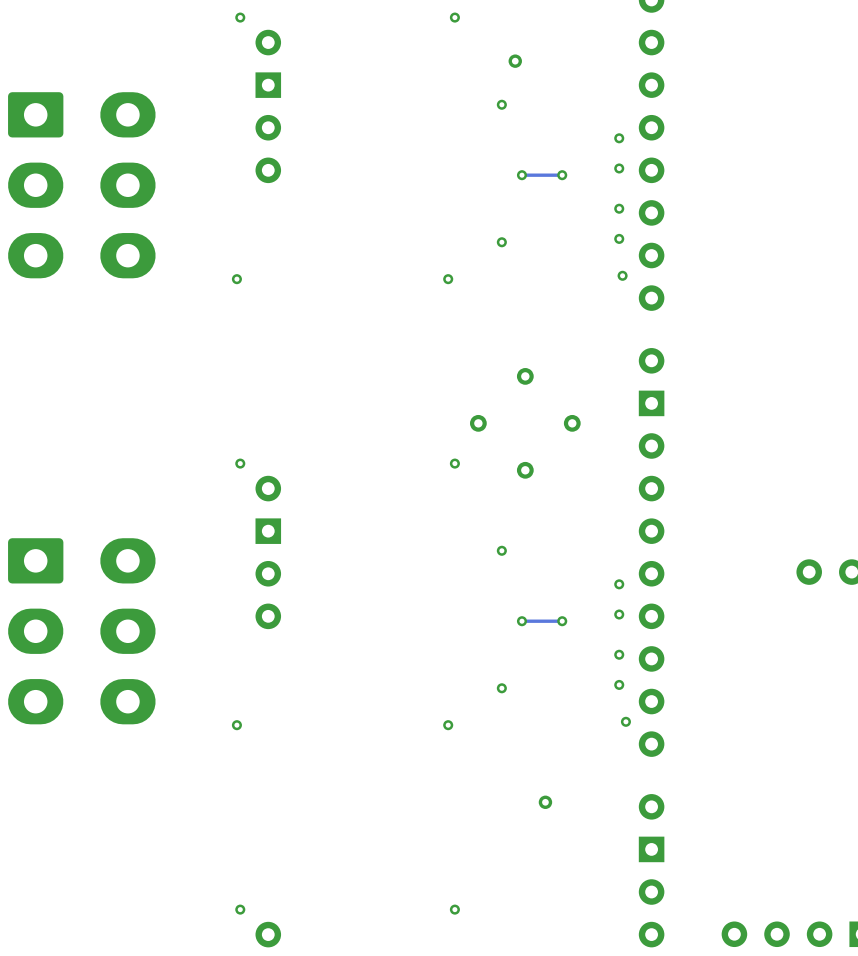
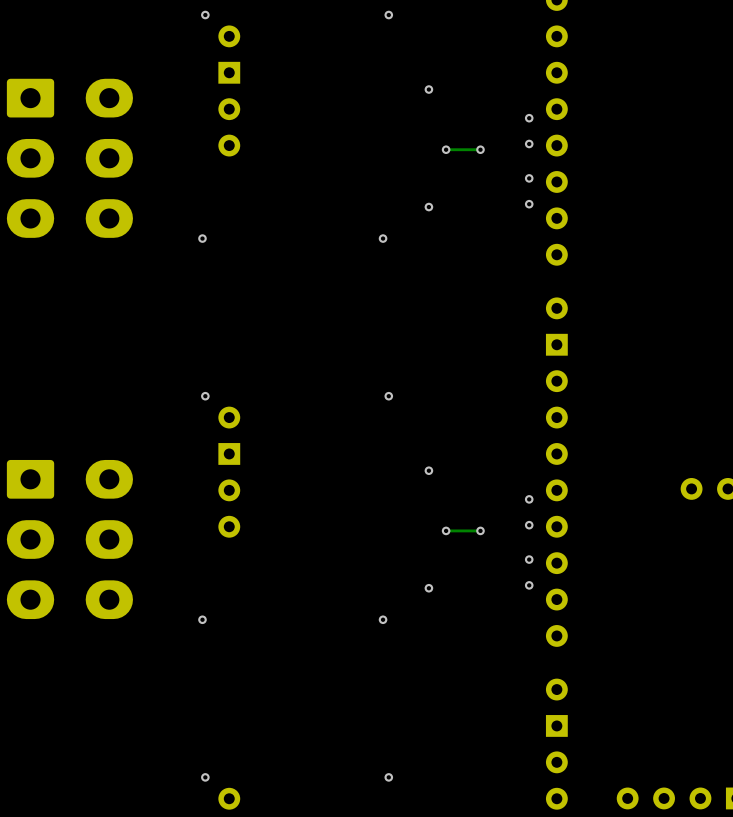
via: (515, 61) -> none
via: (622, 275) -> none
via: (525, 376) -> none
via: (478, 423) -> none
via: (572, 423) -> none
via: (525, 470) -> none
via: (625, 721) -> none
via: (545, 802) -> none

